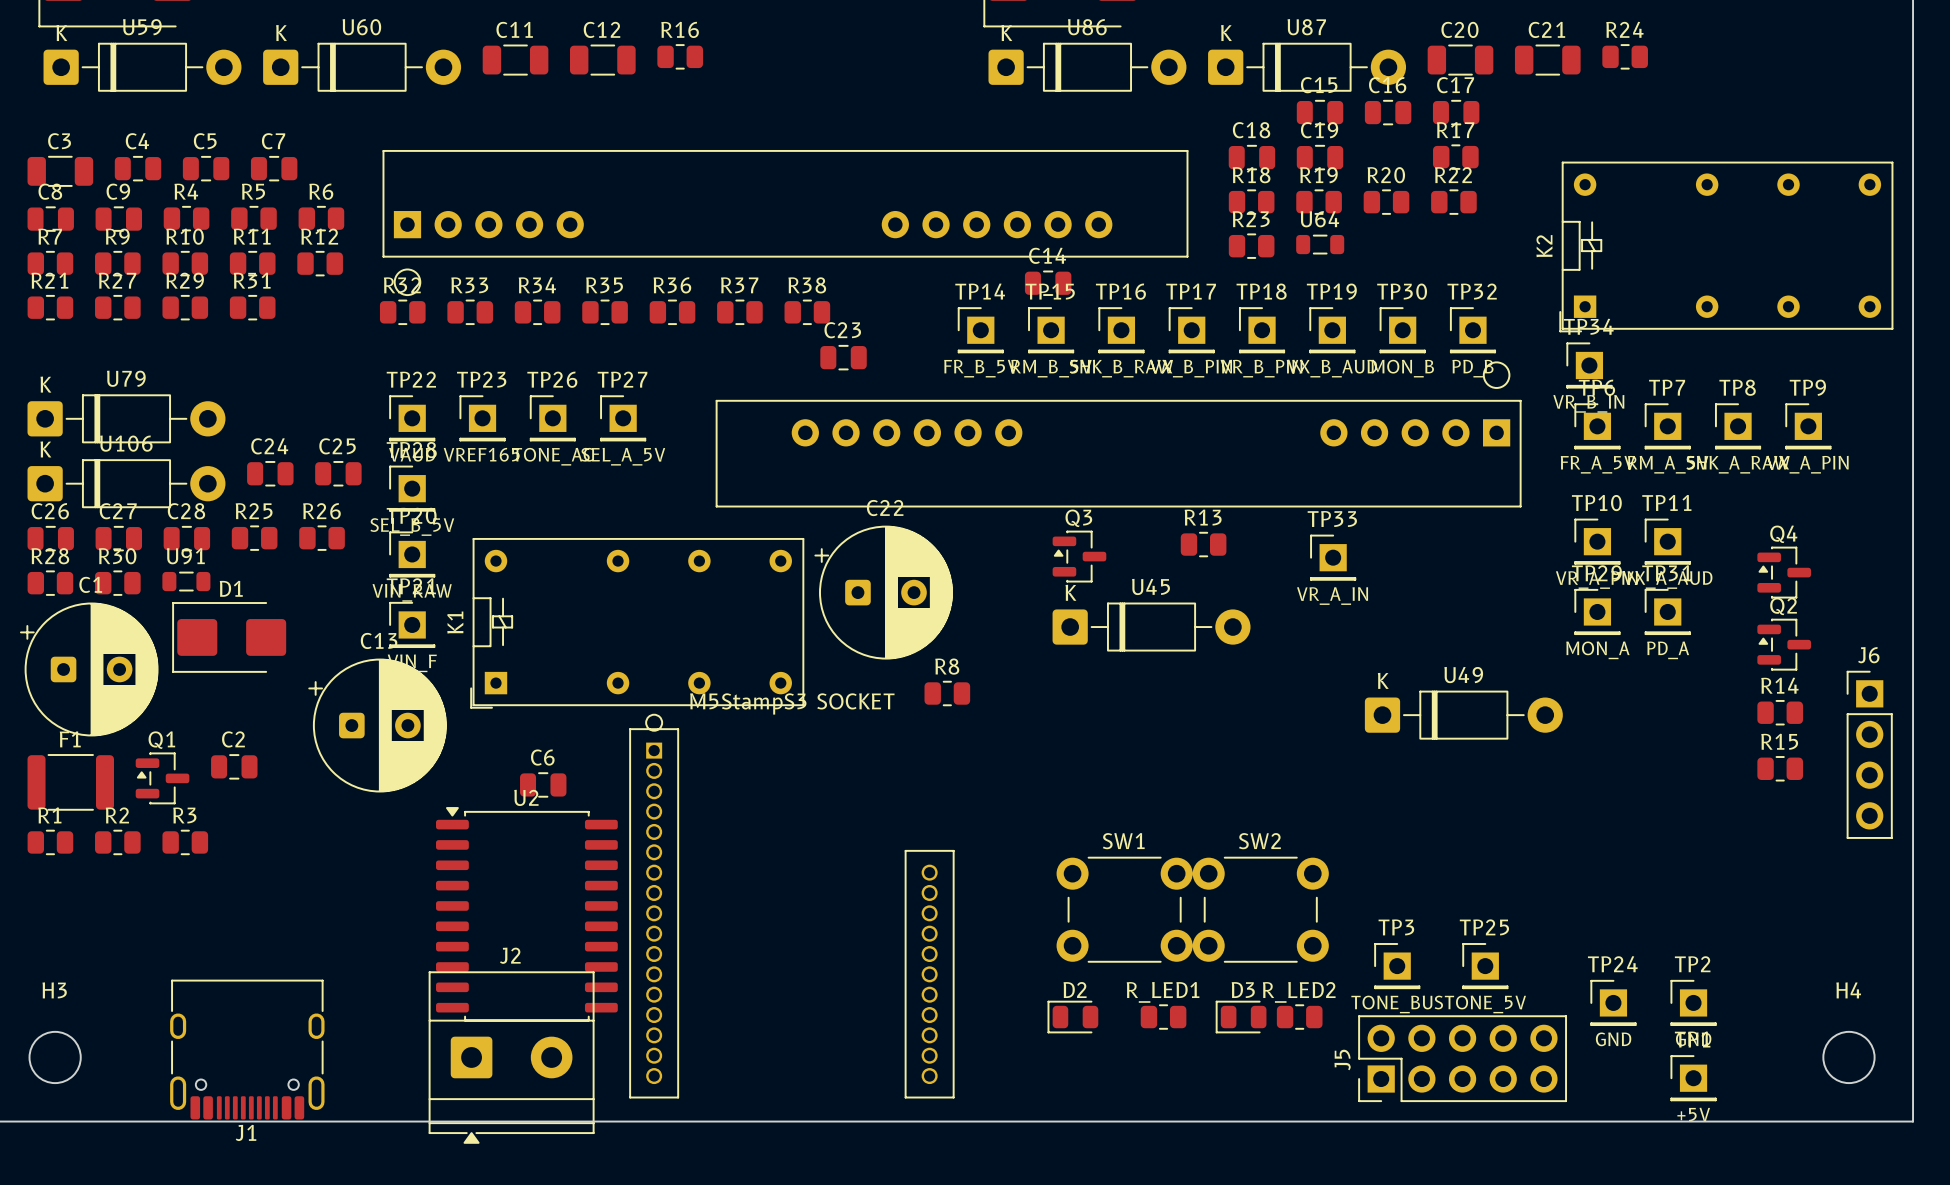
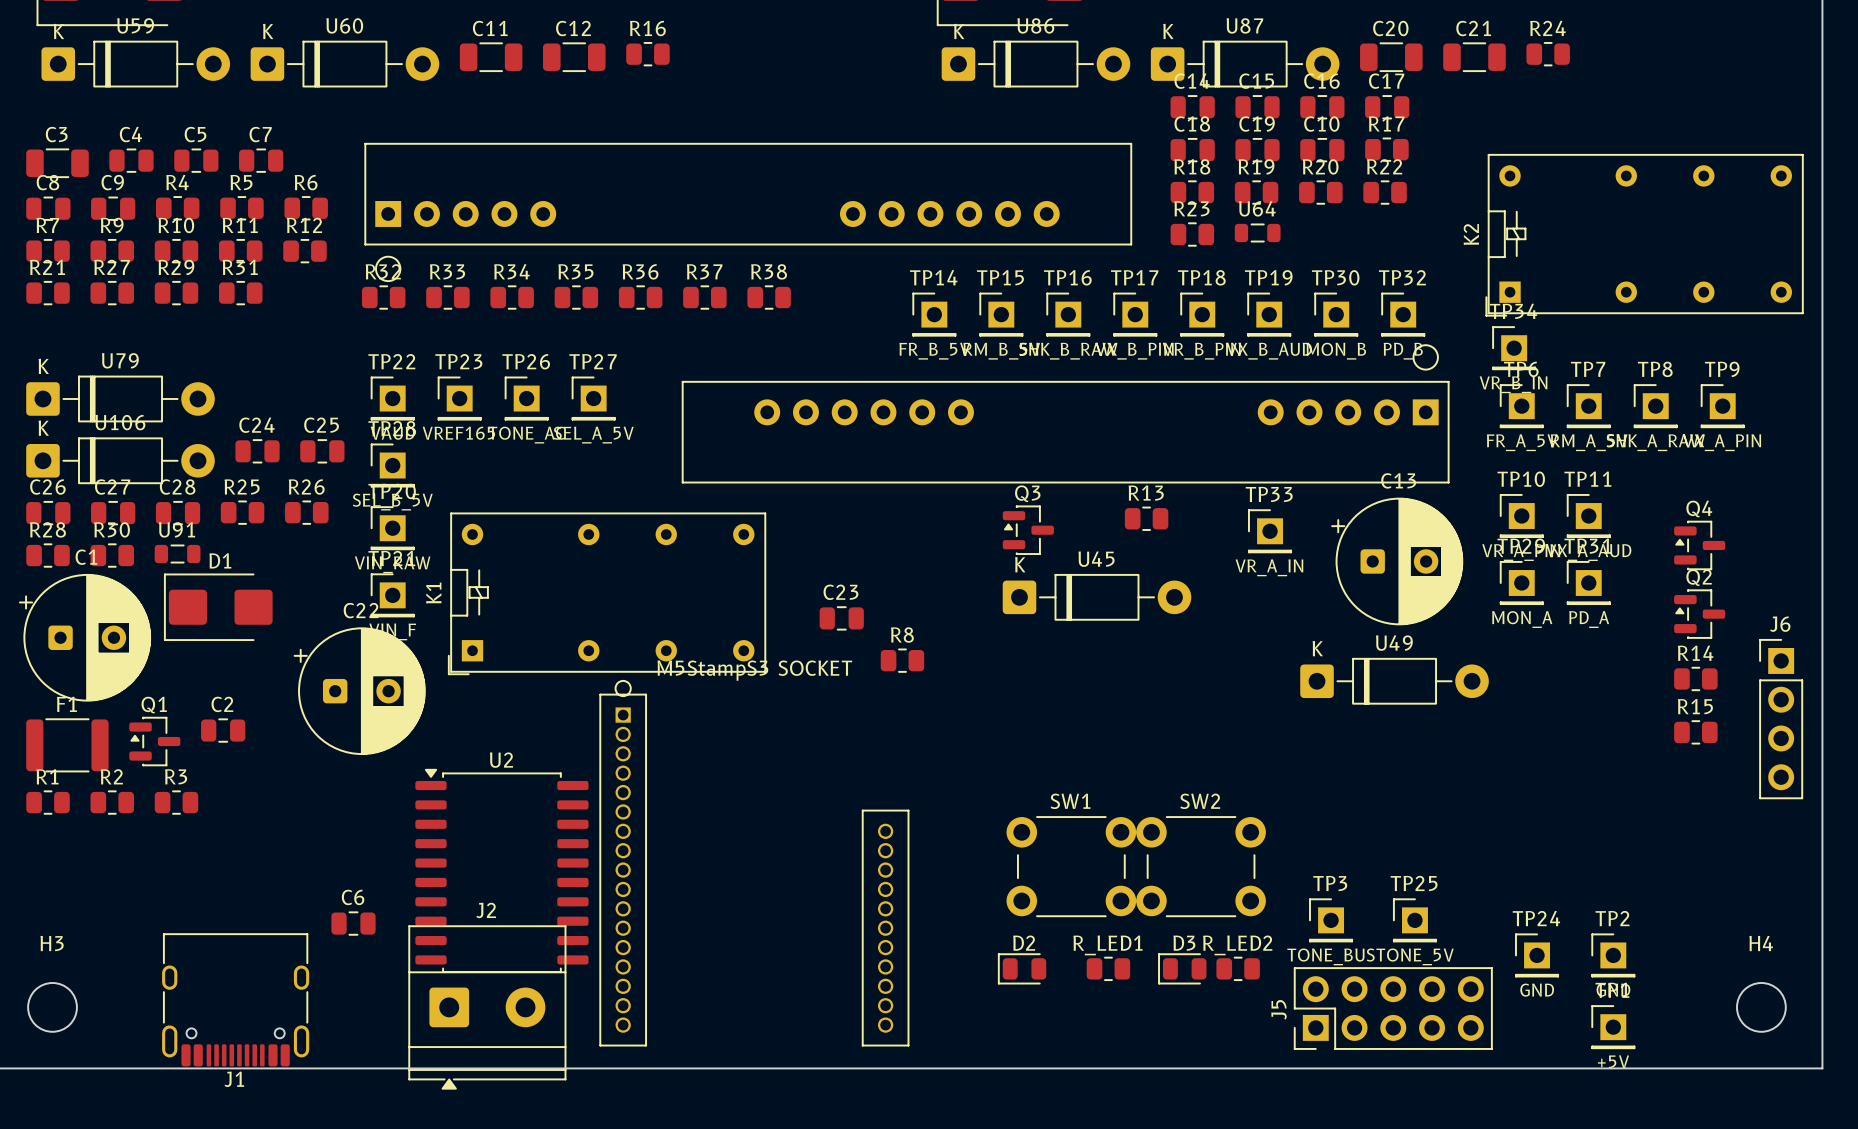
C10: none -> (1322, 150)
C14 position: (1048, 283) -> (1192, 107)
C23 position: (843, 357) -> (841, 618)
C13: none -> (1397, 561)
C22: (883, 592) -> none
C13 name: C13 (379, 640) -> C22 (361, 610)
C6 position: (543, 784) -> (353, 923)

